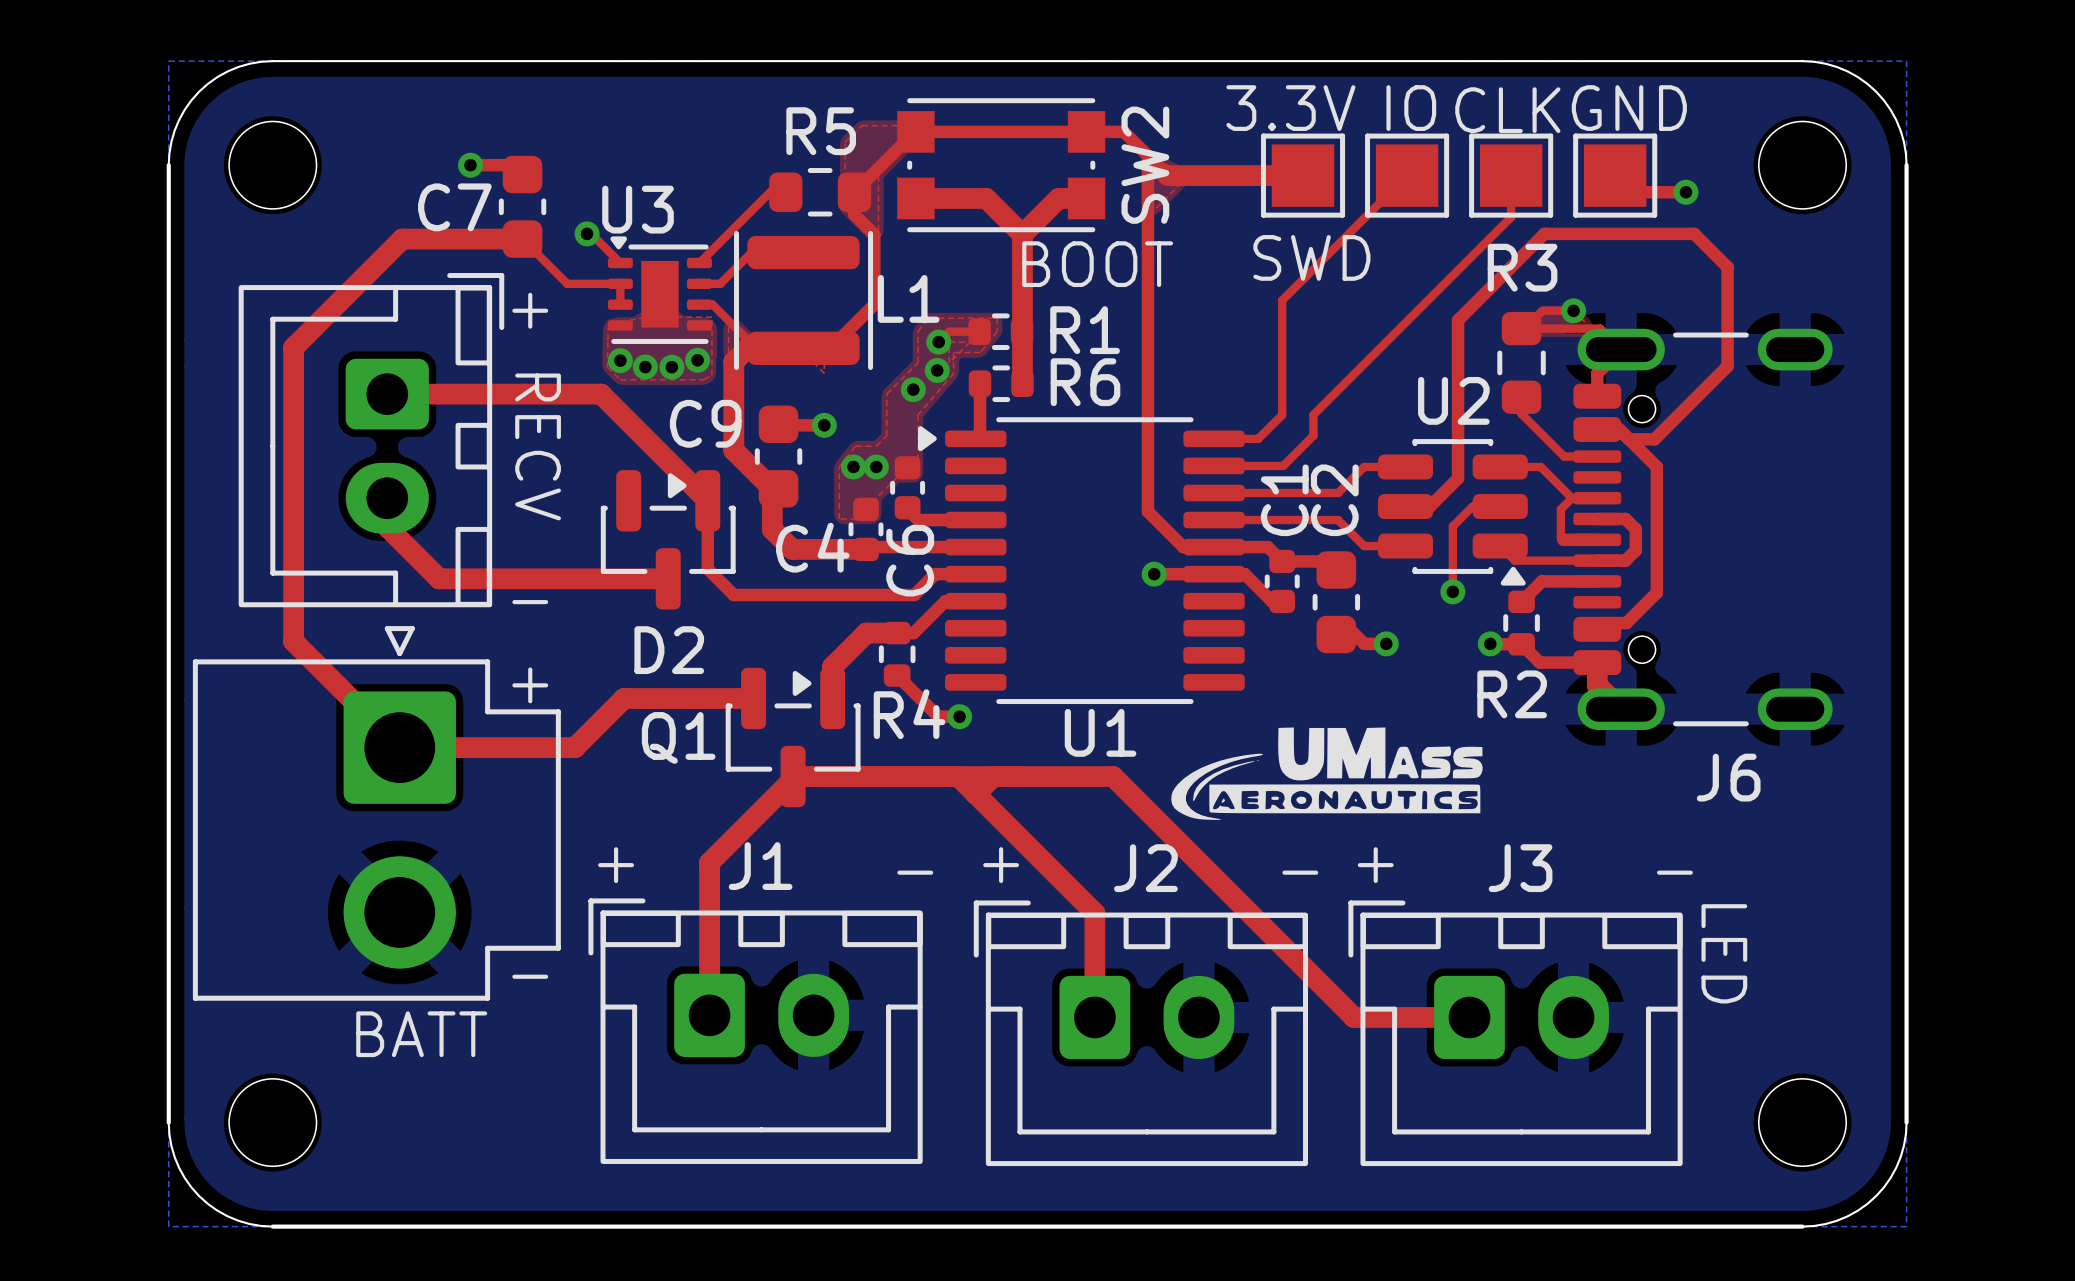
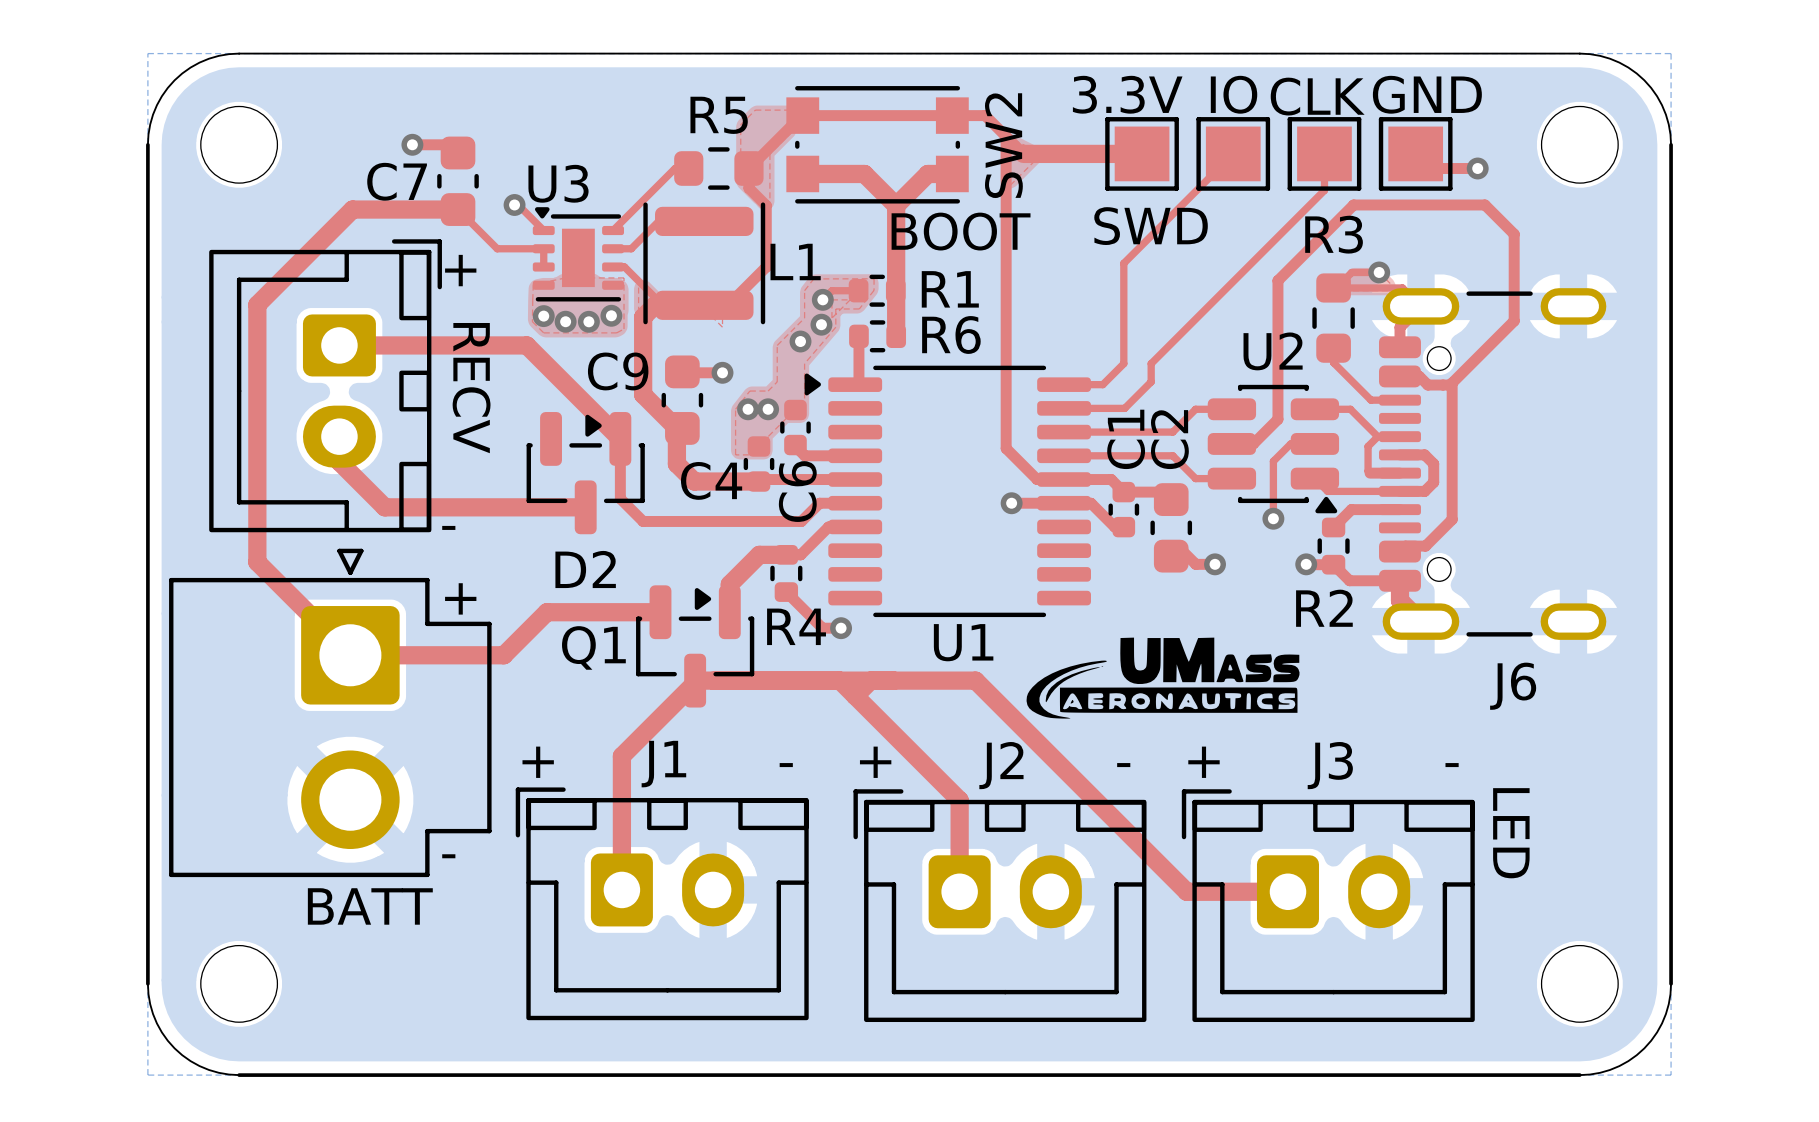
top track: (1629, 439) (1656, 466) -> (1452, 383) (1452, 409)

